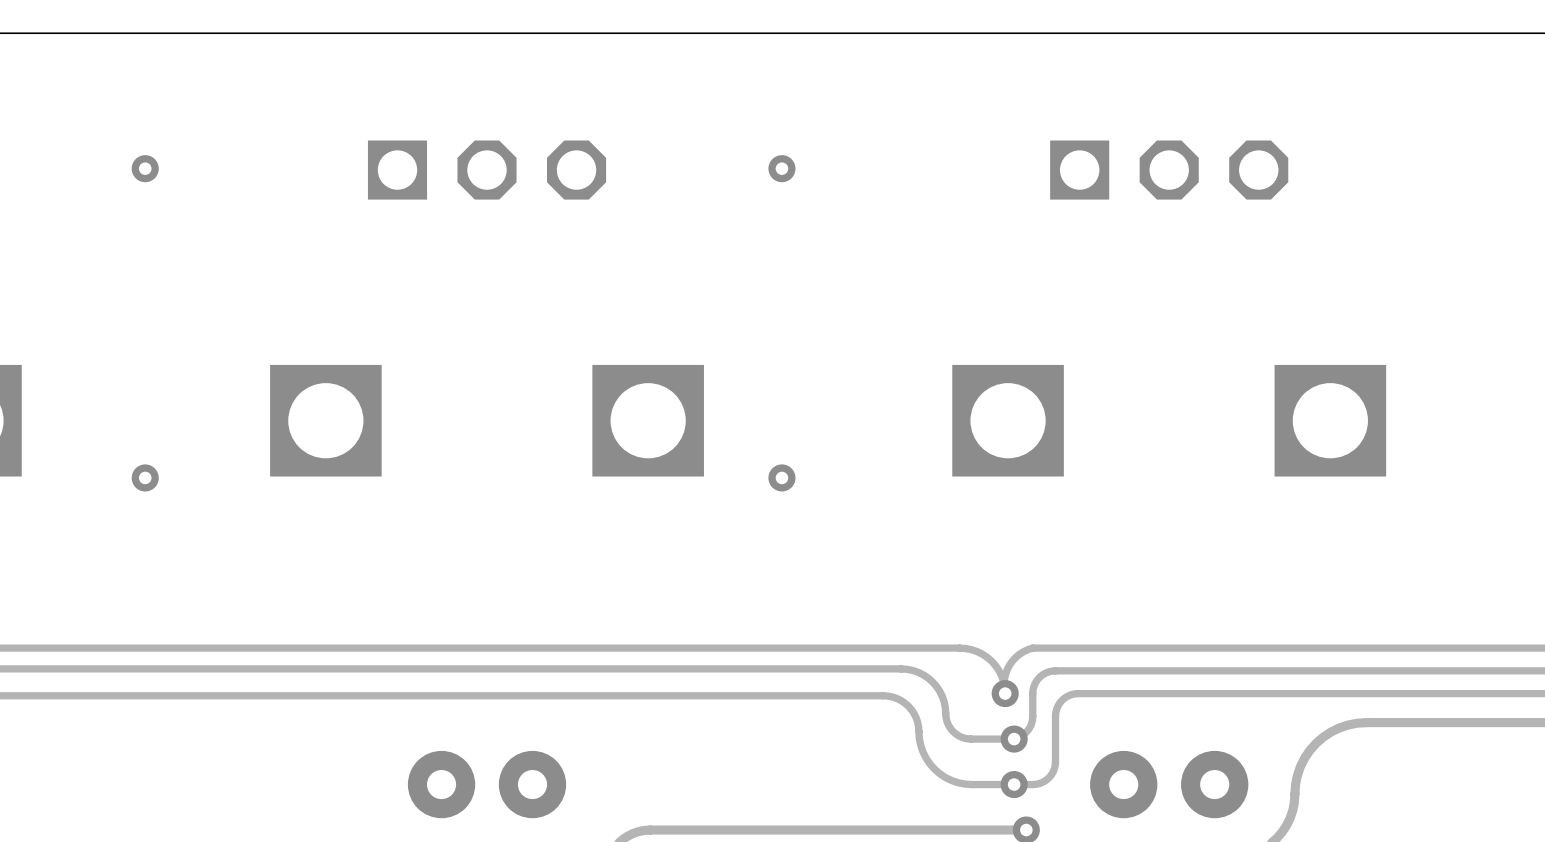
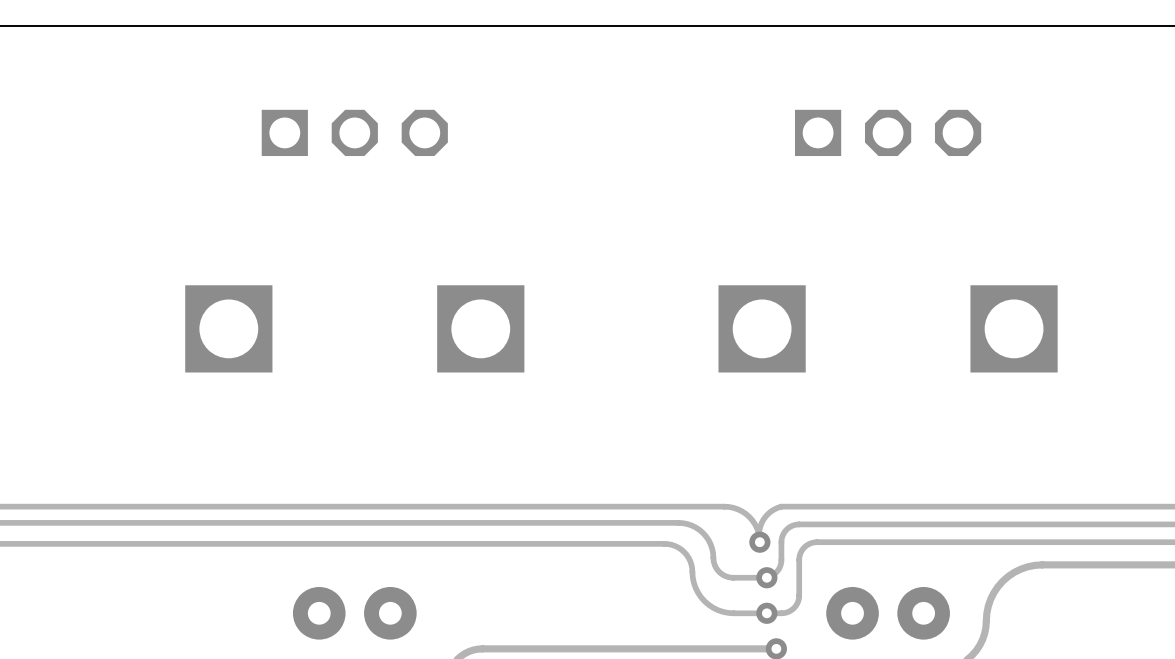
via: (145, 168) -> none
via: (781, 168) -> none
via: (145, 477) -> none
via: (781, 477) -> none

